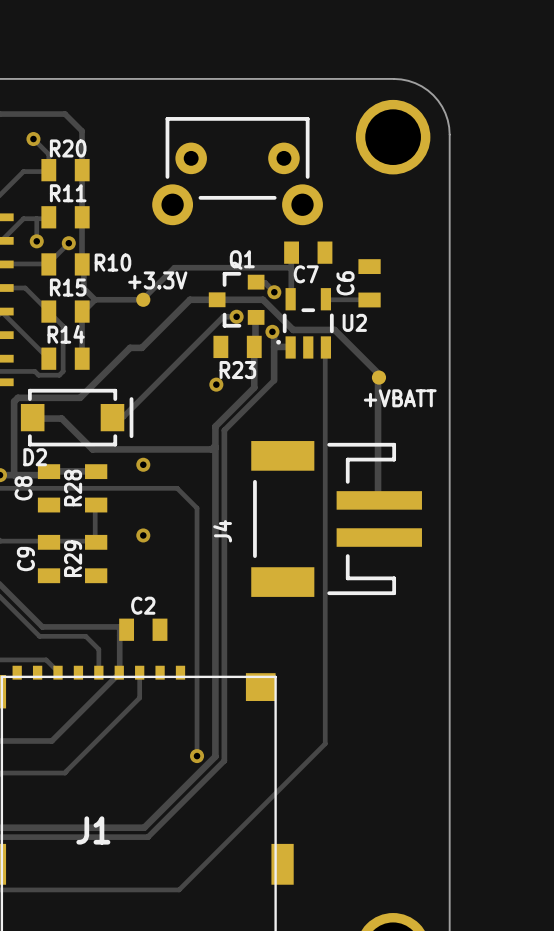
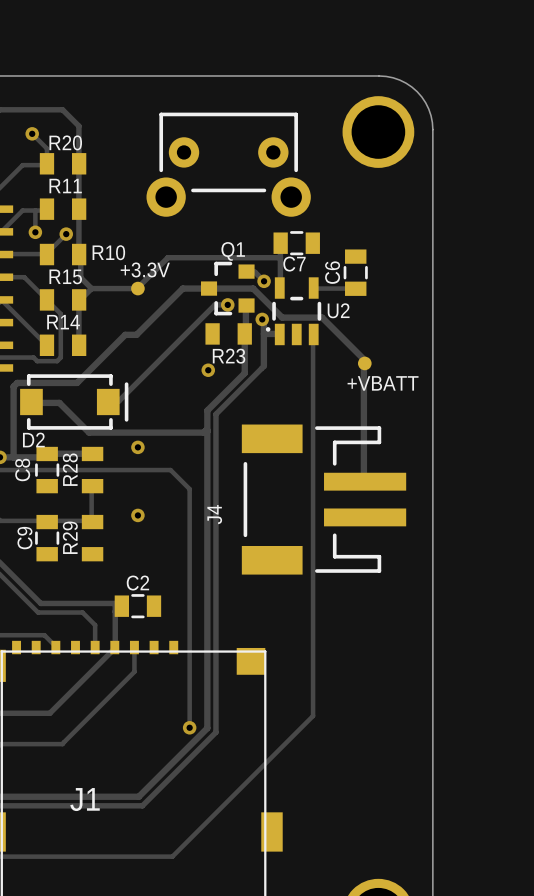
C7 footprint: [284, 241, 333, 264] -> [273, 231, 320, 256]
C6 footprint: [358, 259, 381, 308] -> [343, 249, 368, 296]
C8 footprint: [37, 464, 61, 513] -> [35, 446, 60, 494]
C9 footprint: [37, 534, 61, 584] -> [35, 514, 60, 562]
C2 footprint: [119, 618, 168, 641] -> [114, 594, 162, 619]

